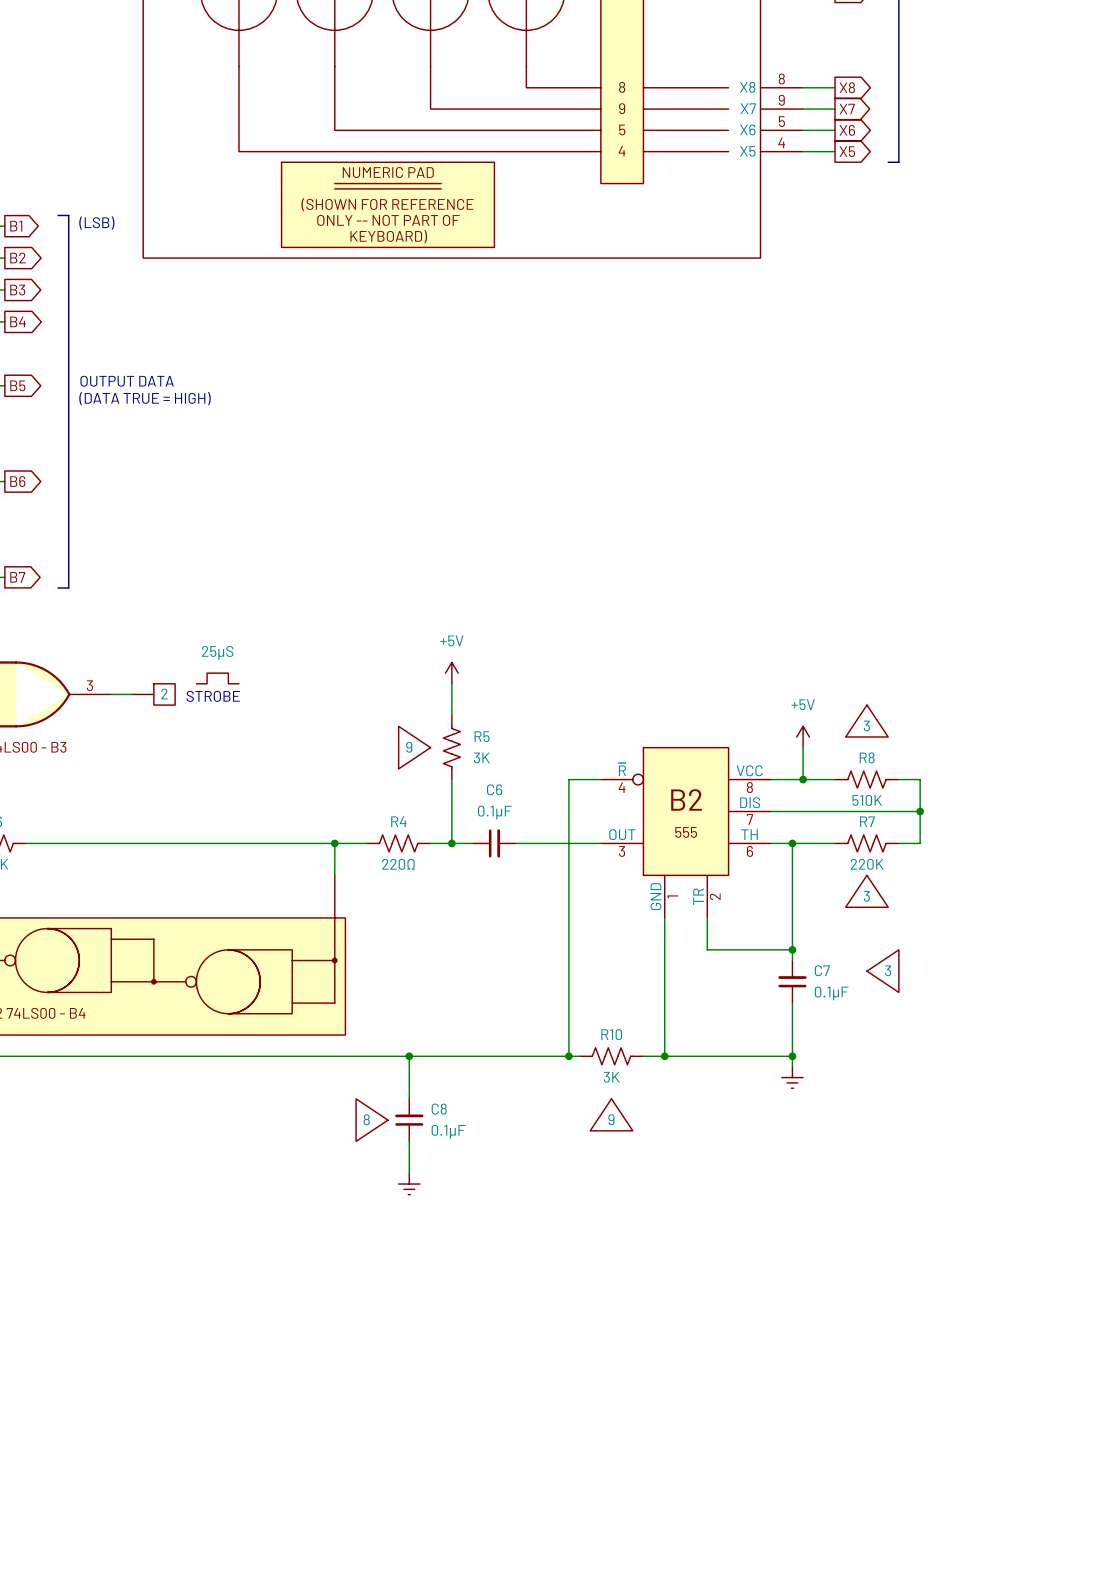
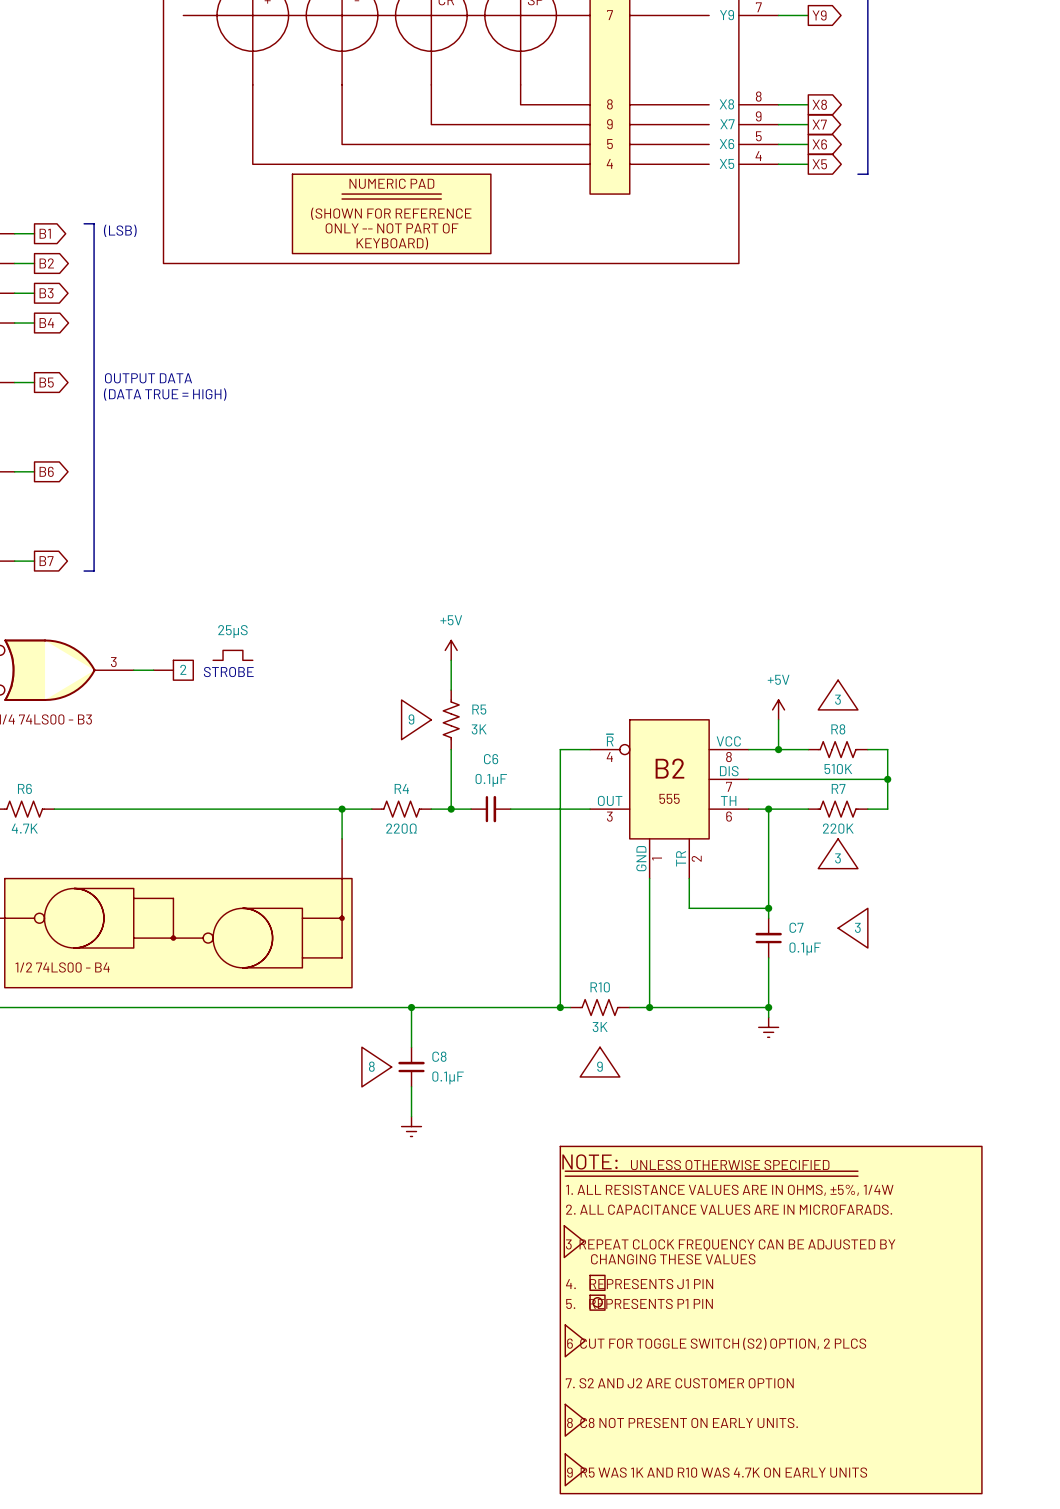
part: none -> (771, 1320)

